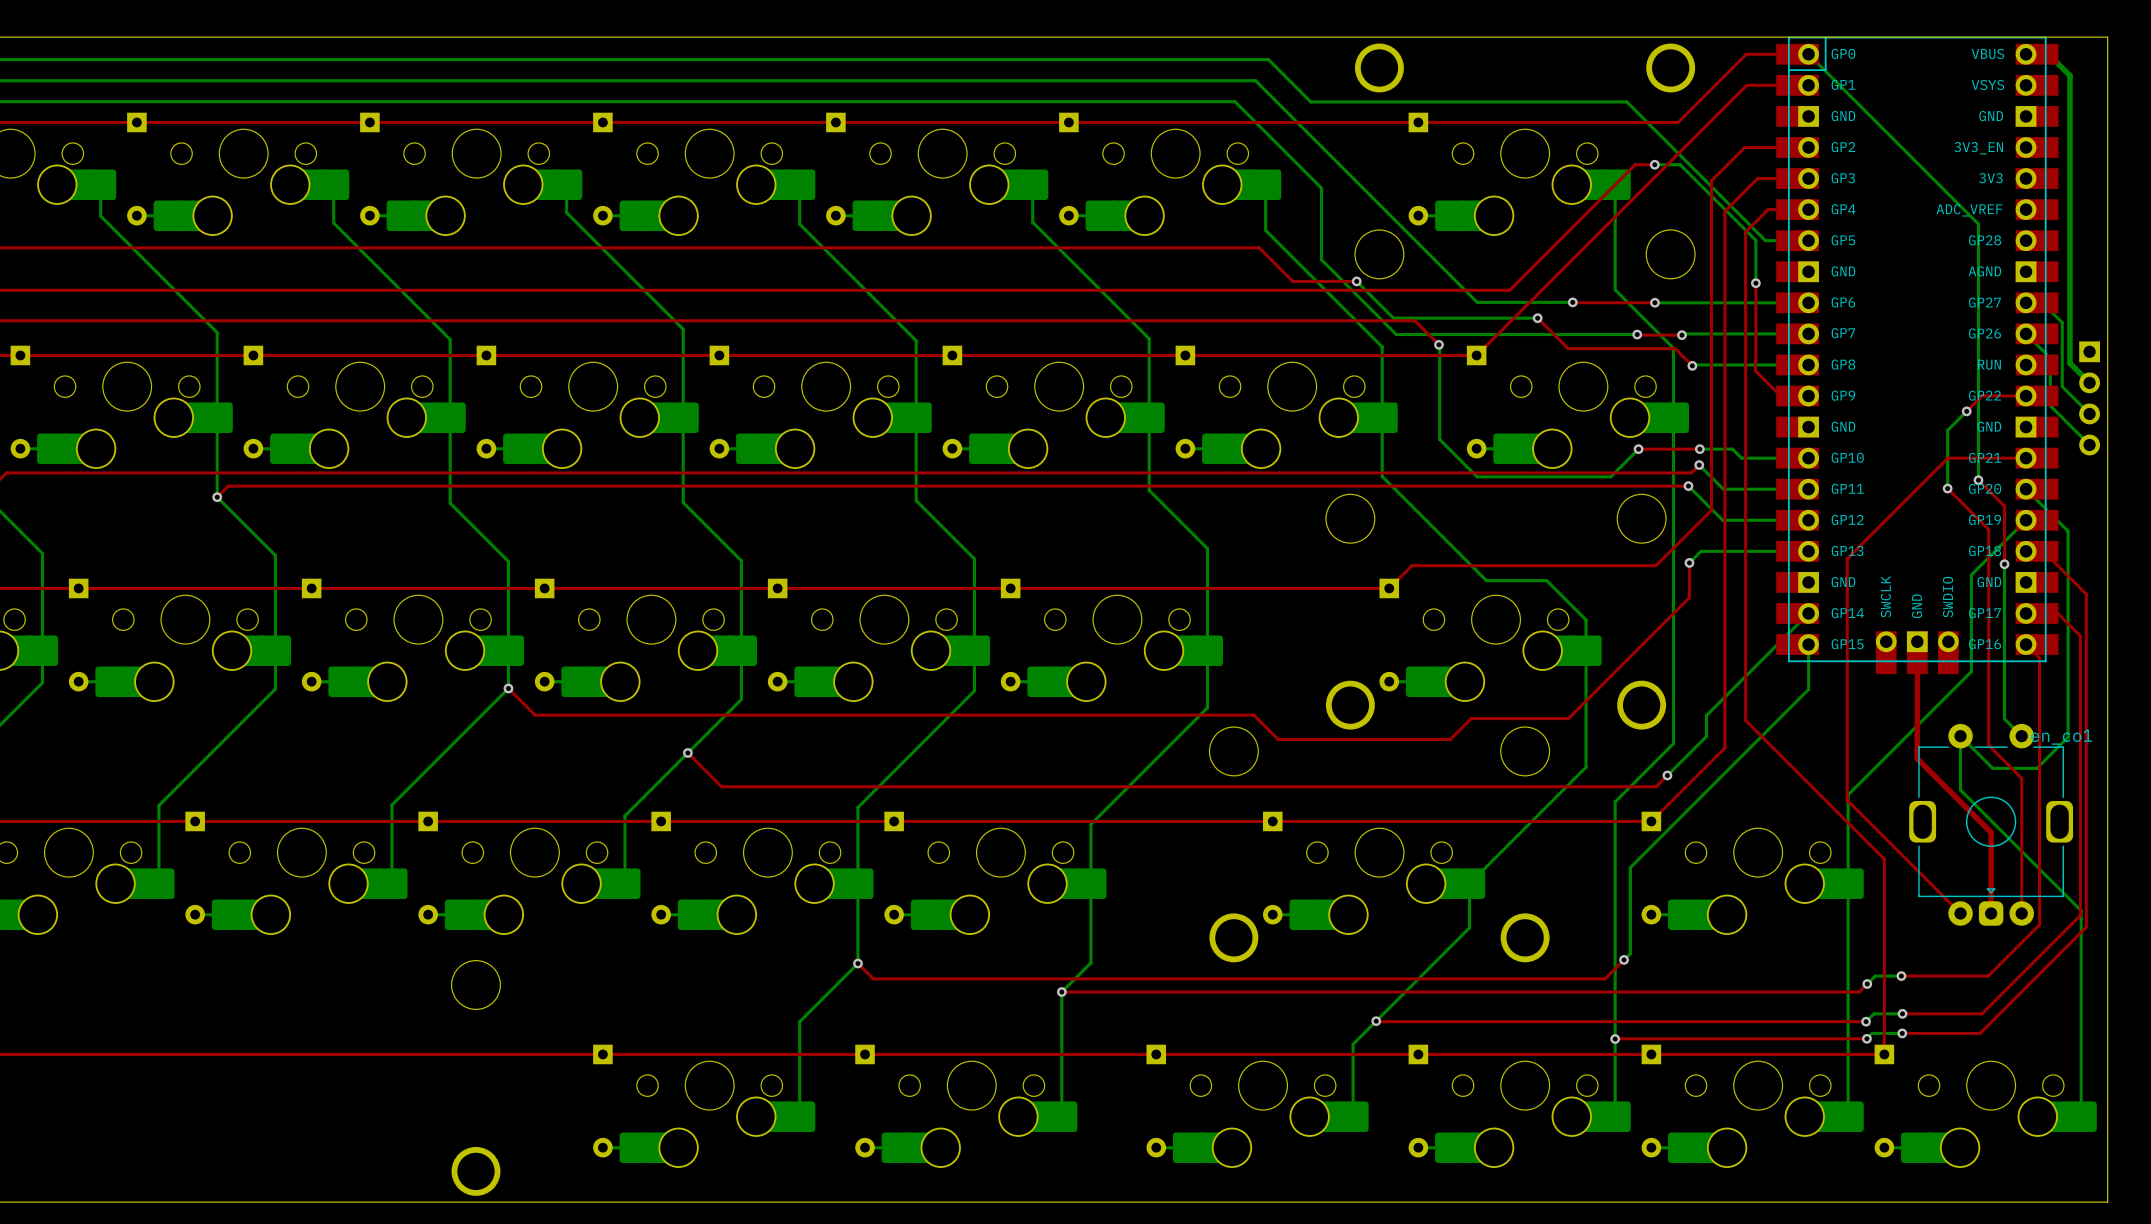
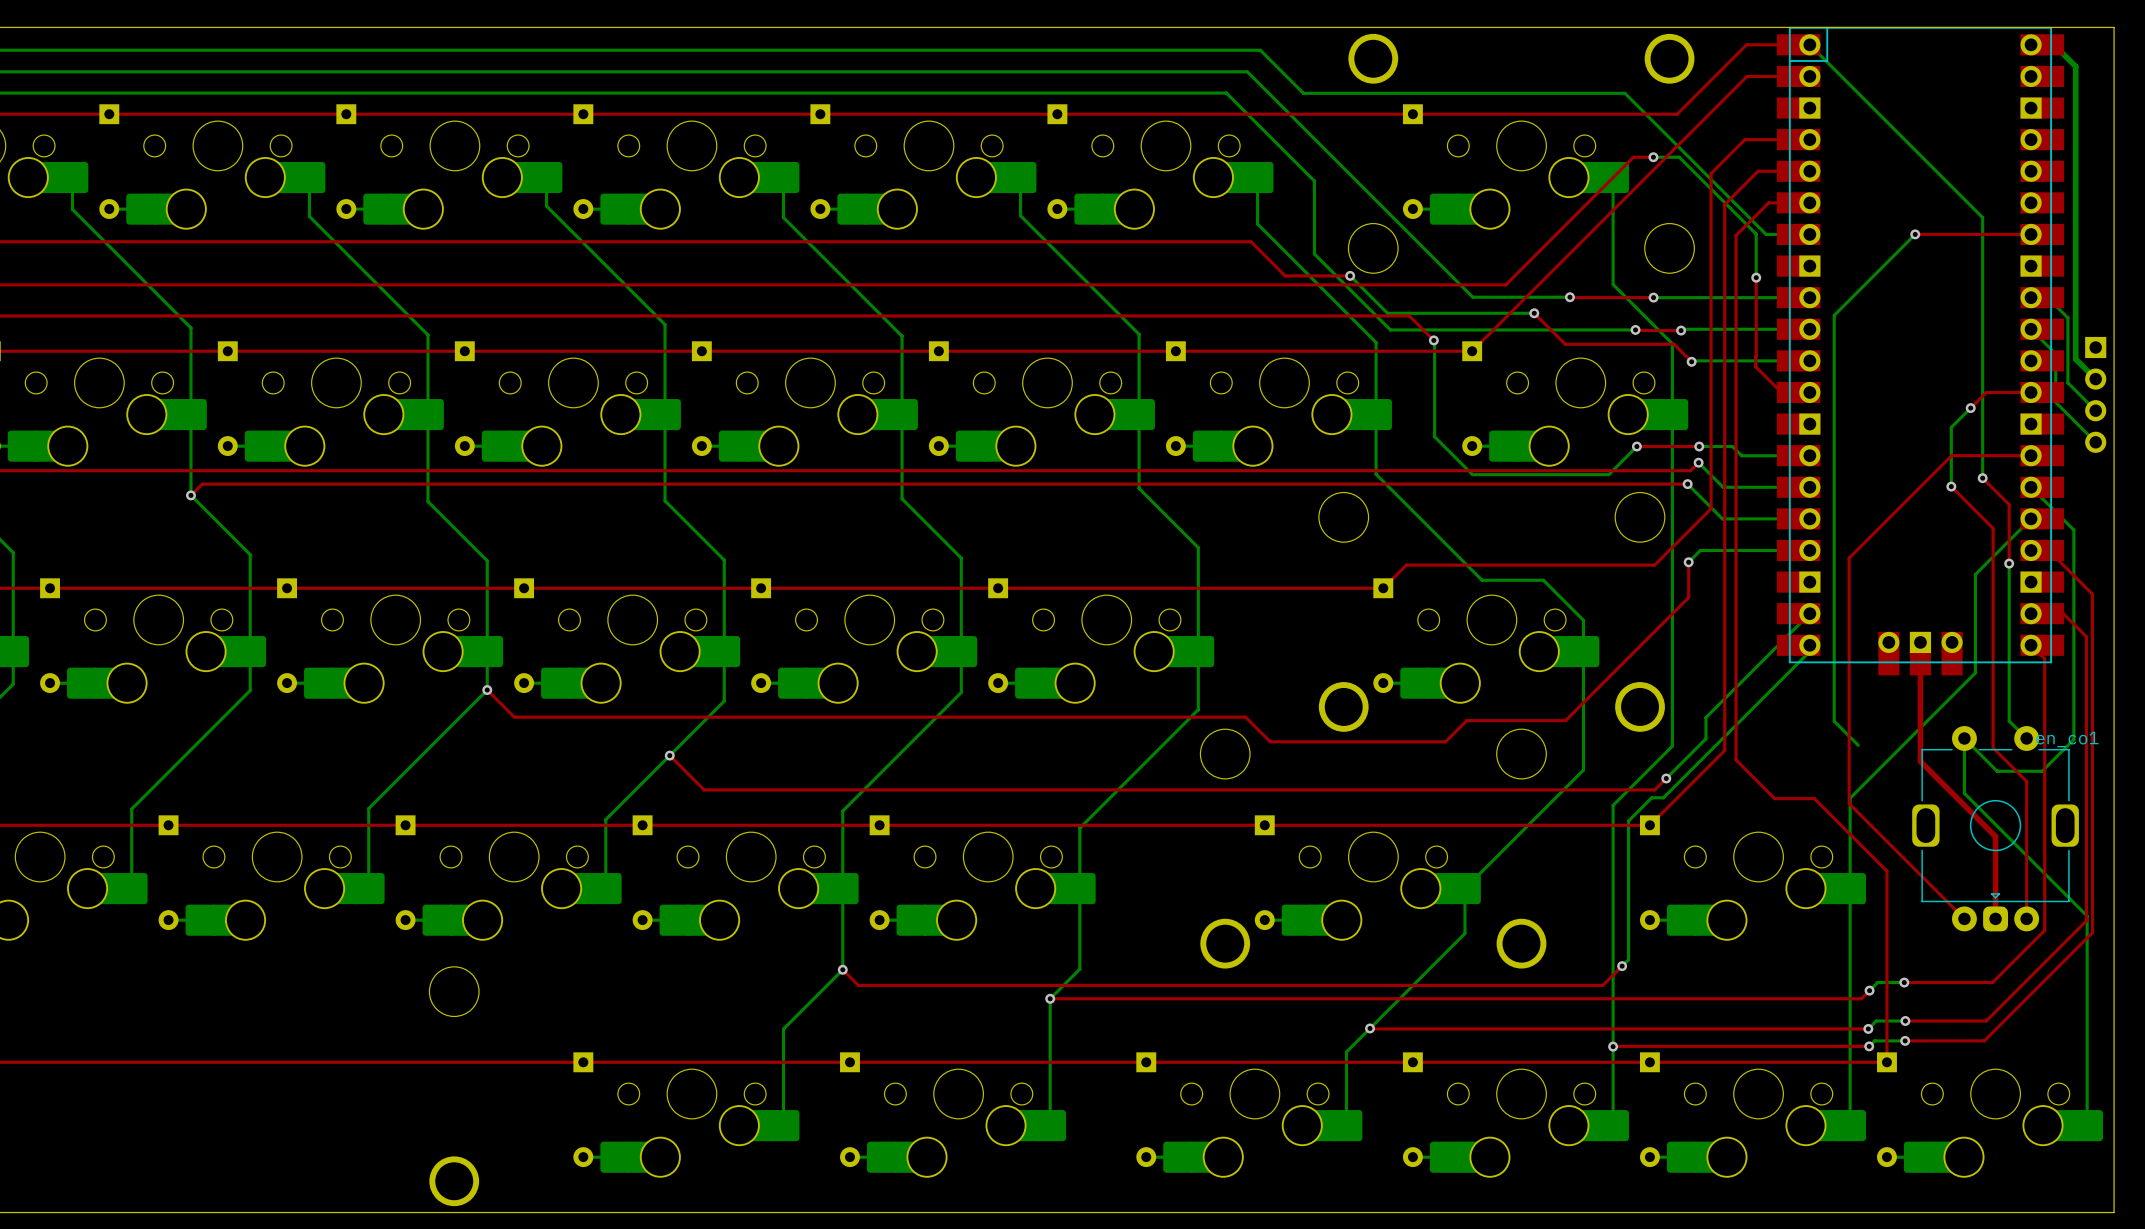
part footprint: [1776, 36, 2059, 675] -> [1776, 26, 2065, 676]
top track: (1745, 232) (1745, 720) (1884, 859) (1884, 866) -> (1745, 225) (1736, 235) (1736, 759) (1774, 798) (1814, 798) (1886, 871)
top track: none -> (1915, 234) (2031, 234)
bottom track: none -> (1915, 234) (1834, 315) (1834, 721) (1858, 745)
via: none -> (1915, 234)
bottom track: (1808, 650) (1808, 689) (1630, 867) -> (1809, 651) (1663, 797) (1651, 797) (1628, 821) (1628, 872)

